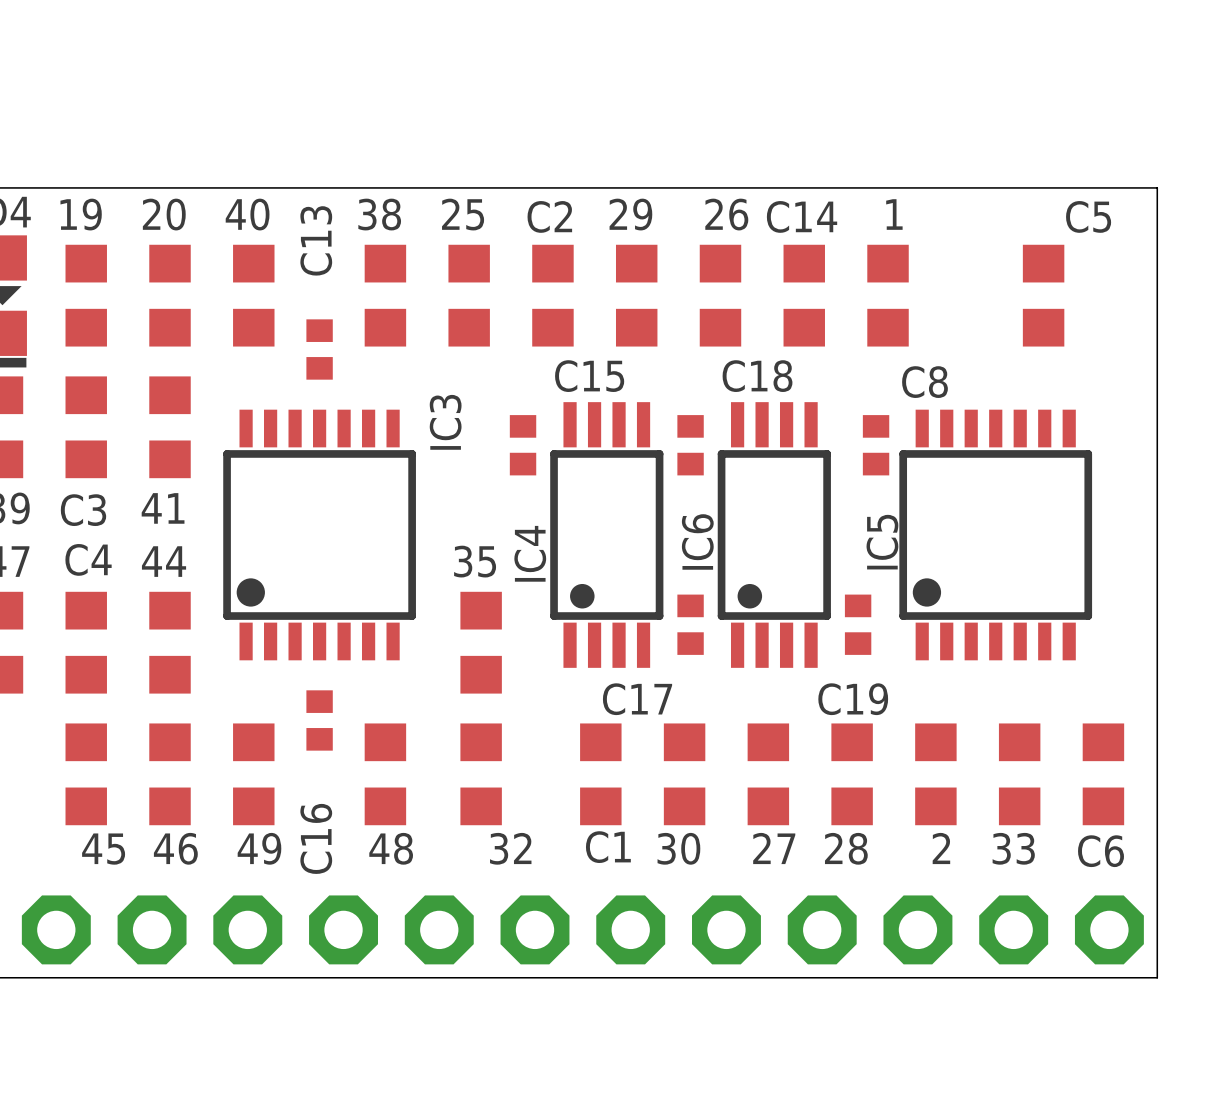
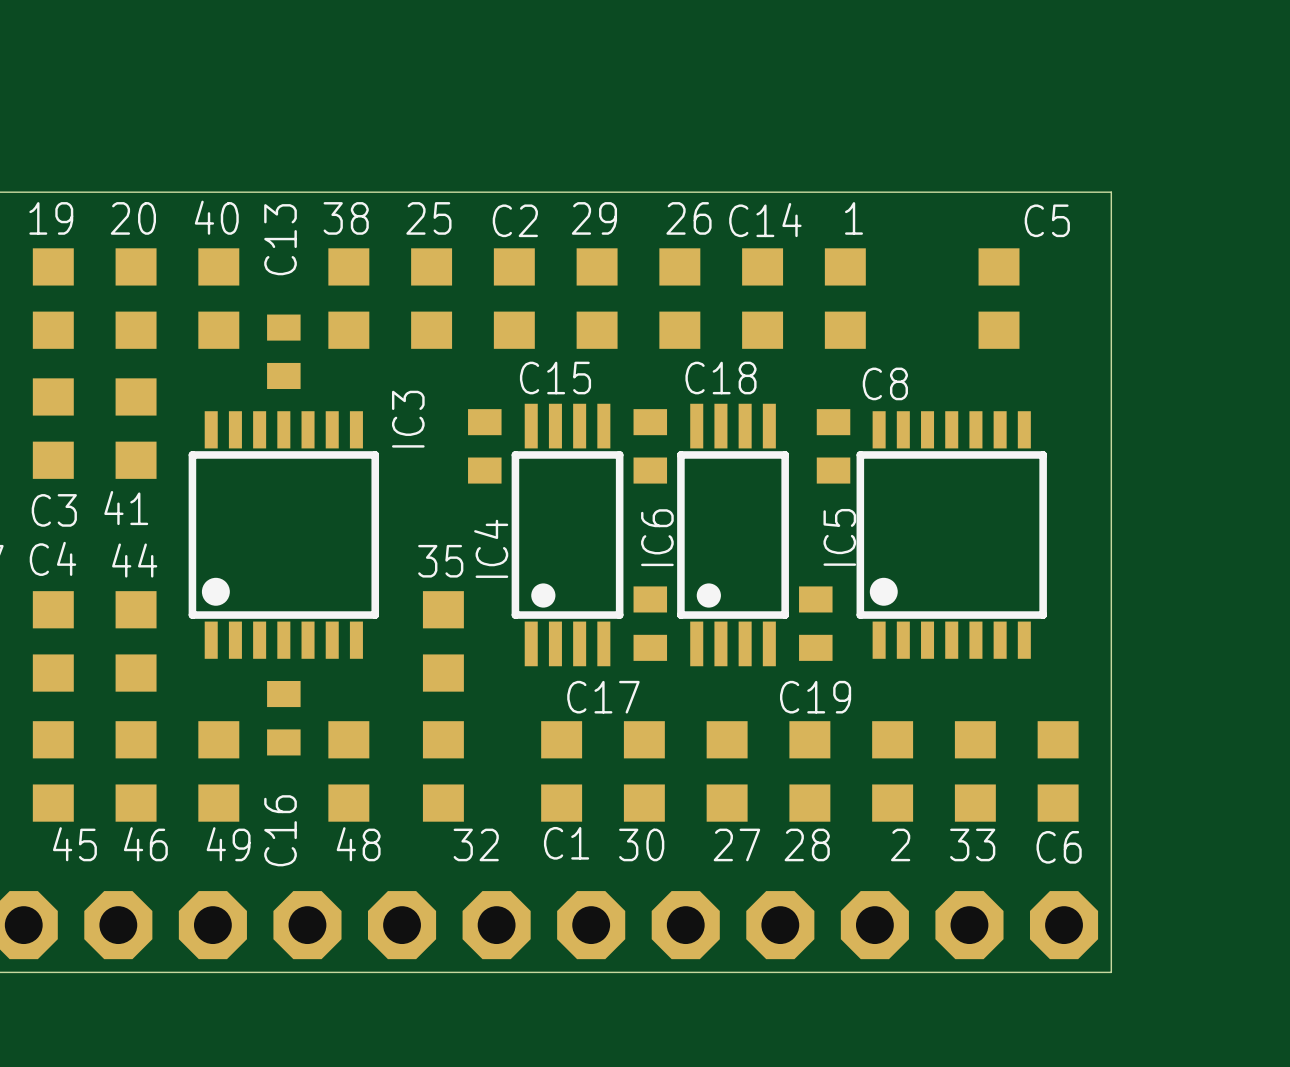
C13 footprint: [306, 319, 333, 380] -> [267, 314, 301, 390]
C15 footprint: [509, 415, 537, 476] -> [468, 409, 502, 484]
C18 footprint: [677, 415, 704, 476] -> [633, 409, 668, 484]
C8 footprint: [862, 415, 890, 476] -> [816, 409, 851, 484]
C17 footprint: [677, 594, 704, 655] -> [633, 586, 668, 661]
C19 footprint: [844, 594, 872, 655] -> [799, 586, 833, 661]
C16 footprint: [306, 690, 333, 751] -> [267, 681, 301, 756]

